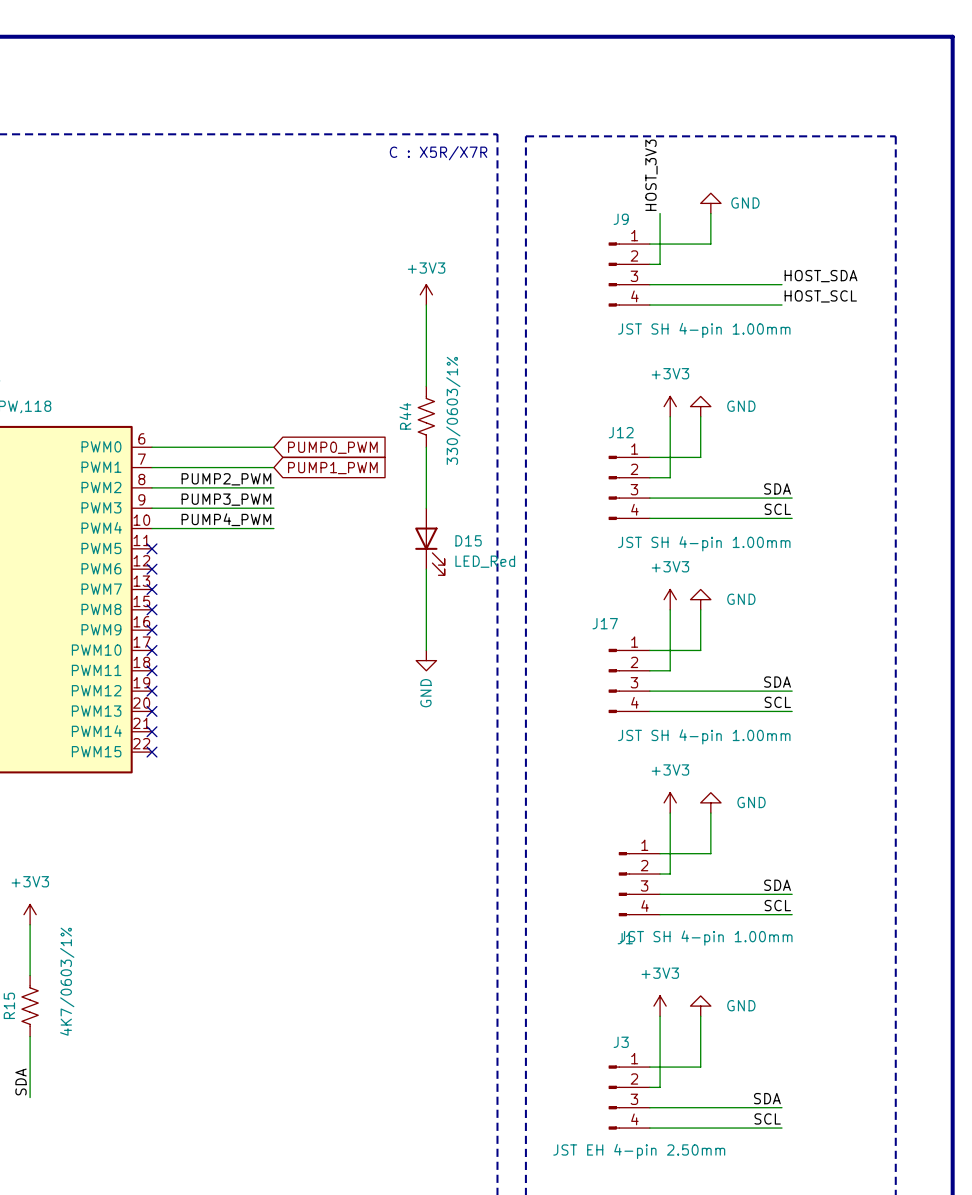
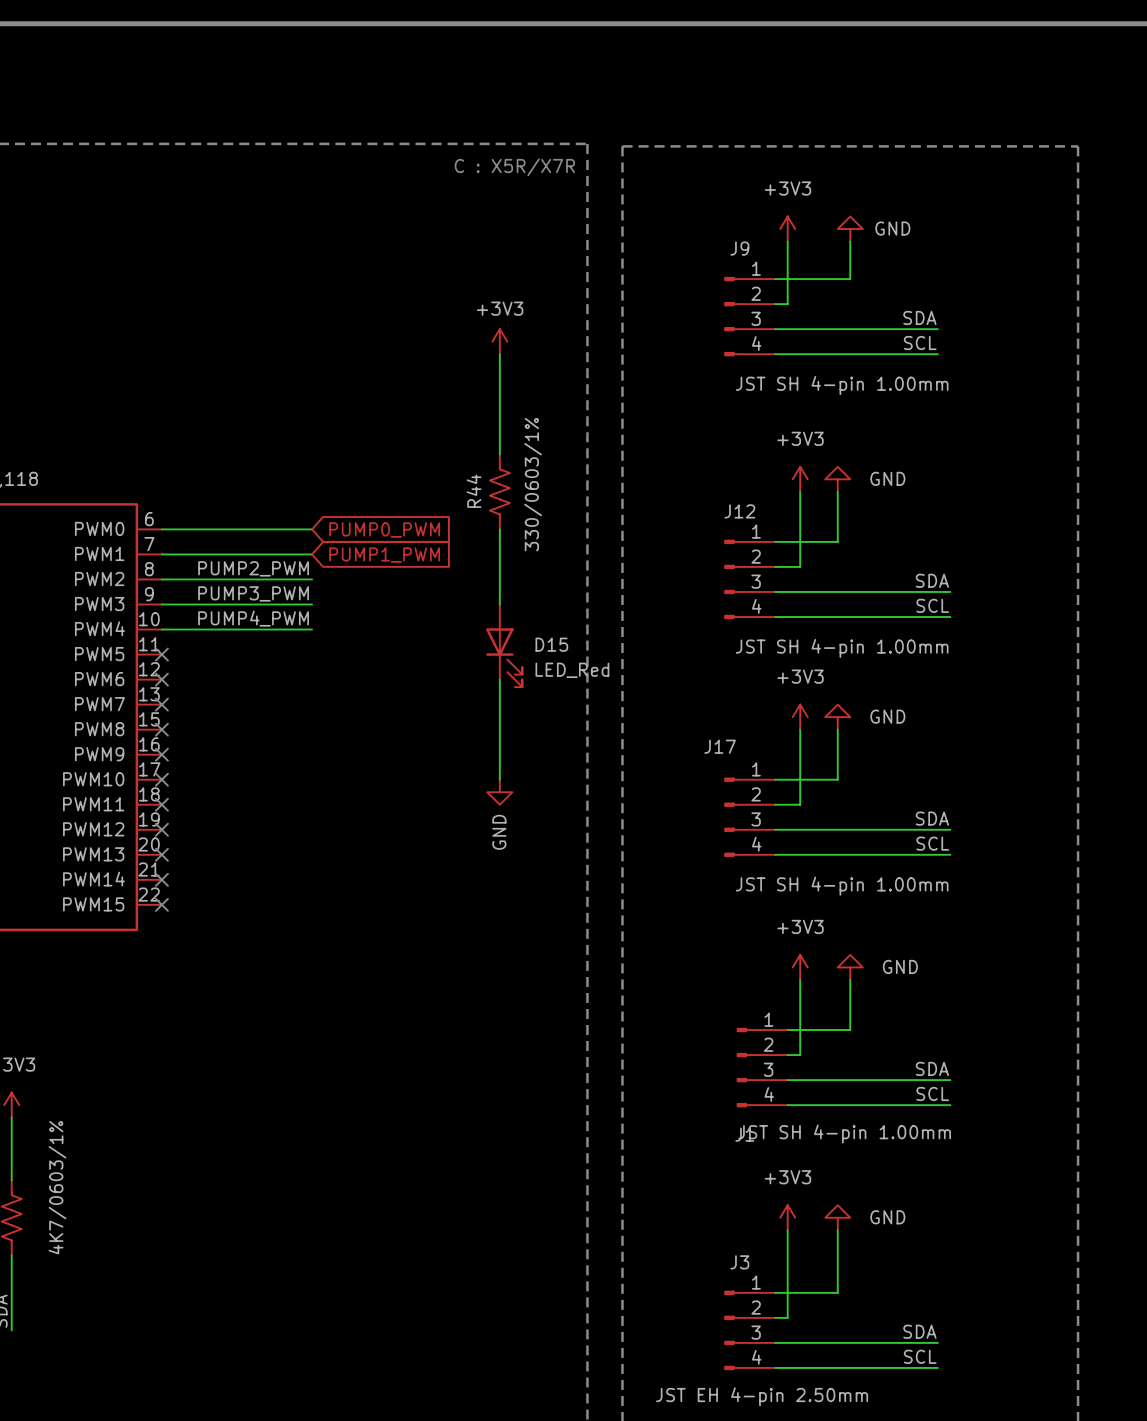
label: HOST_3V3 (651, 175) -> none
power symbol: none -> +3V3 (787, 229)
label: HOST_SDA (821, 276) -> SDA (919, 317)
label: HOST_SCL (820, 296) -> SCL (920, 343)

